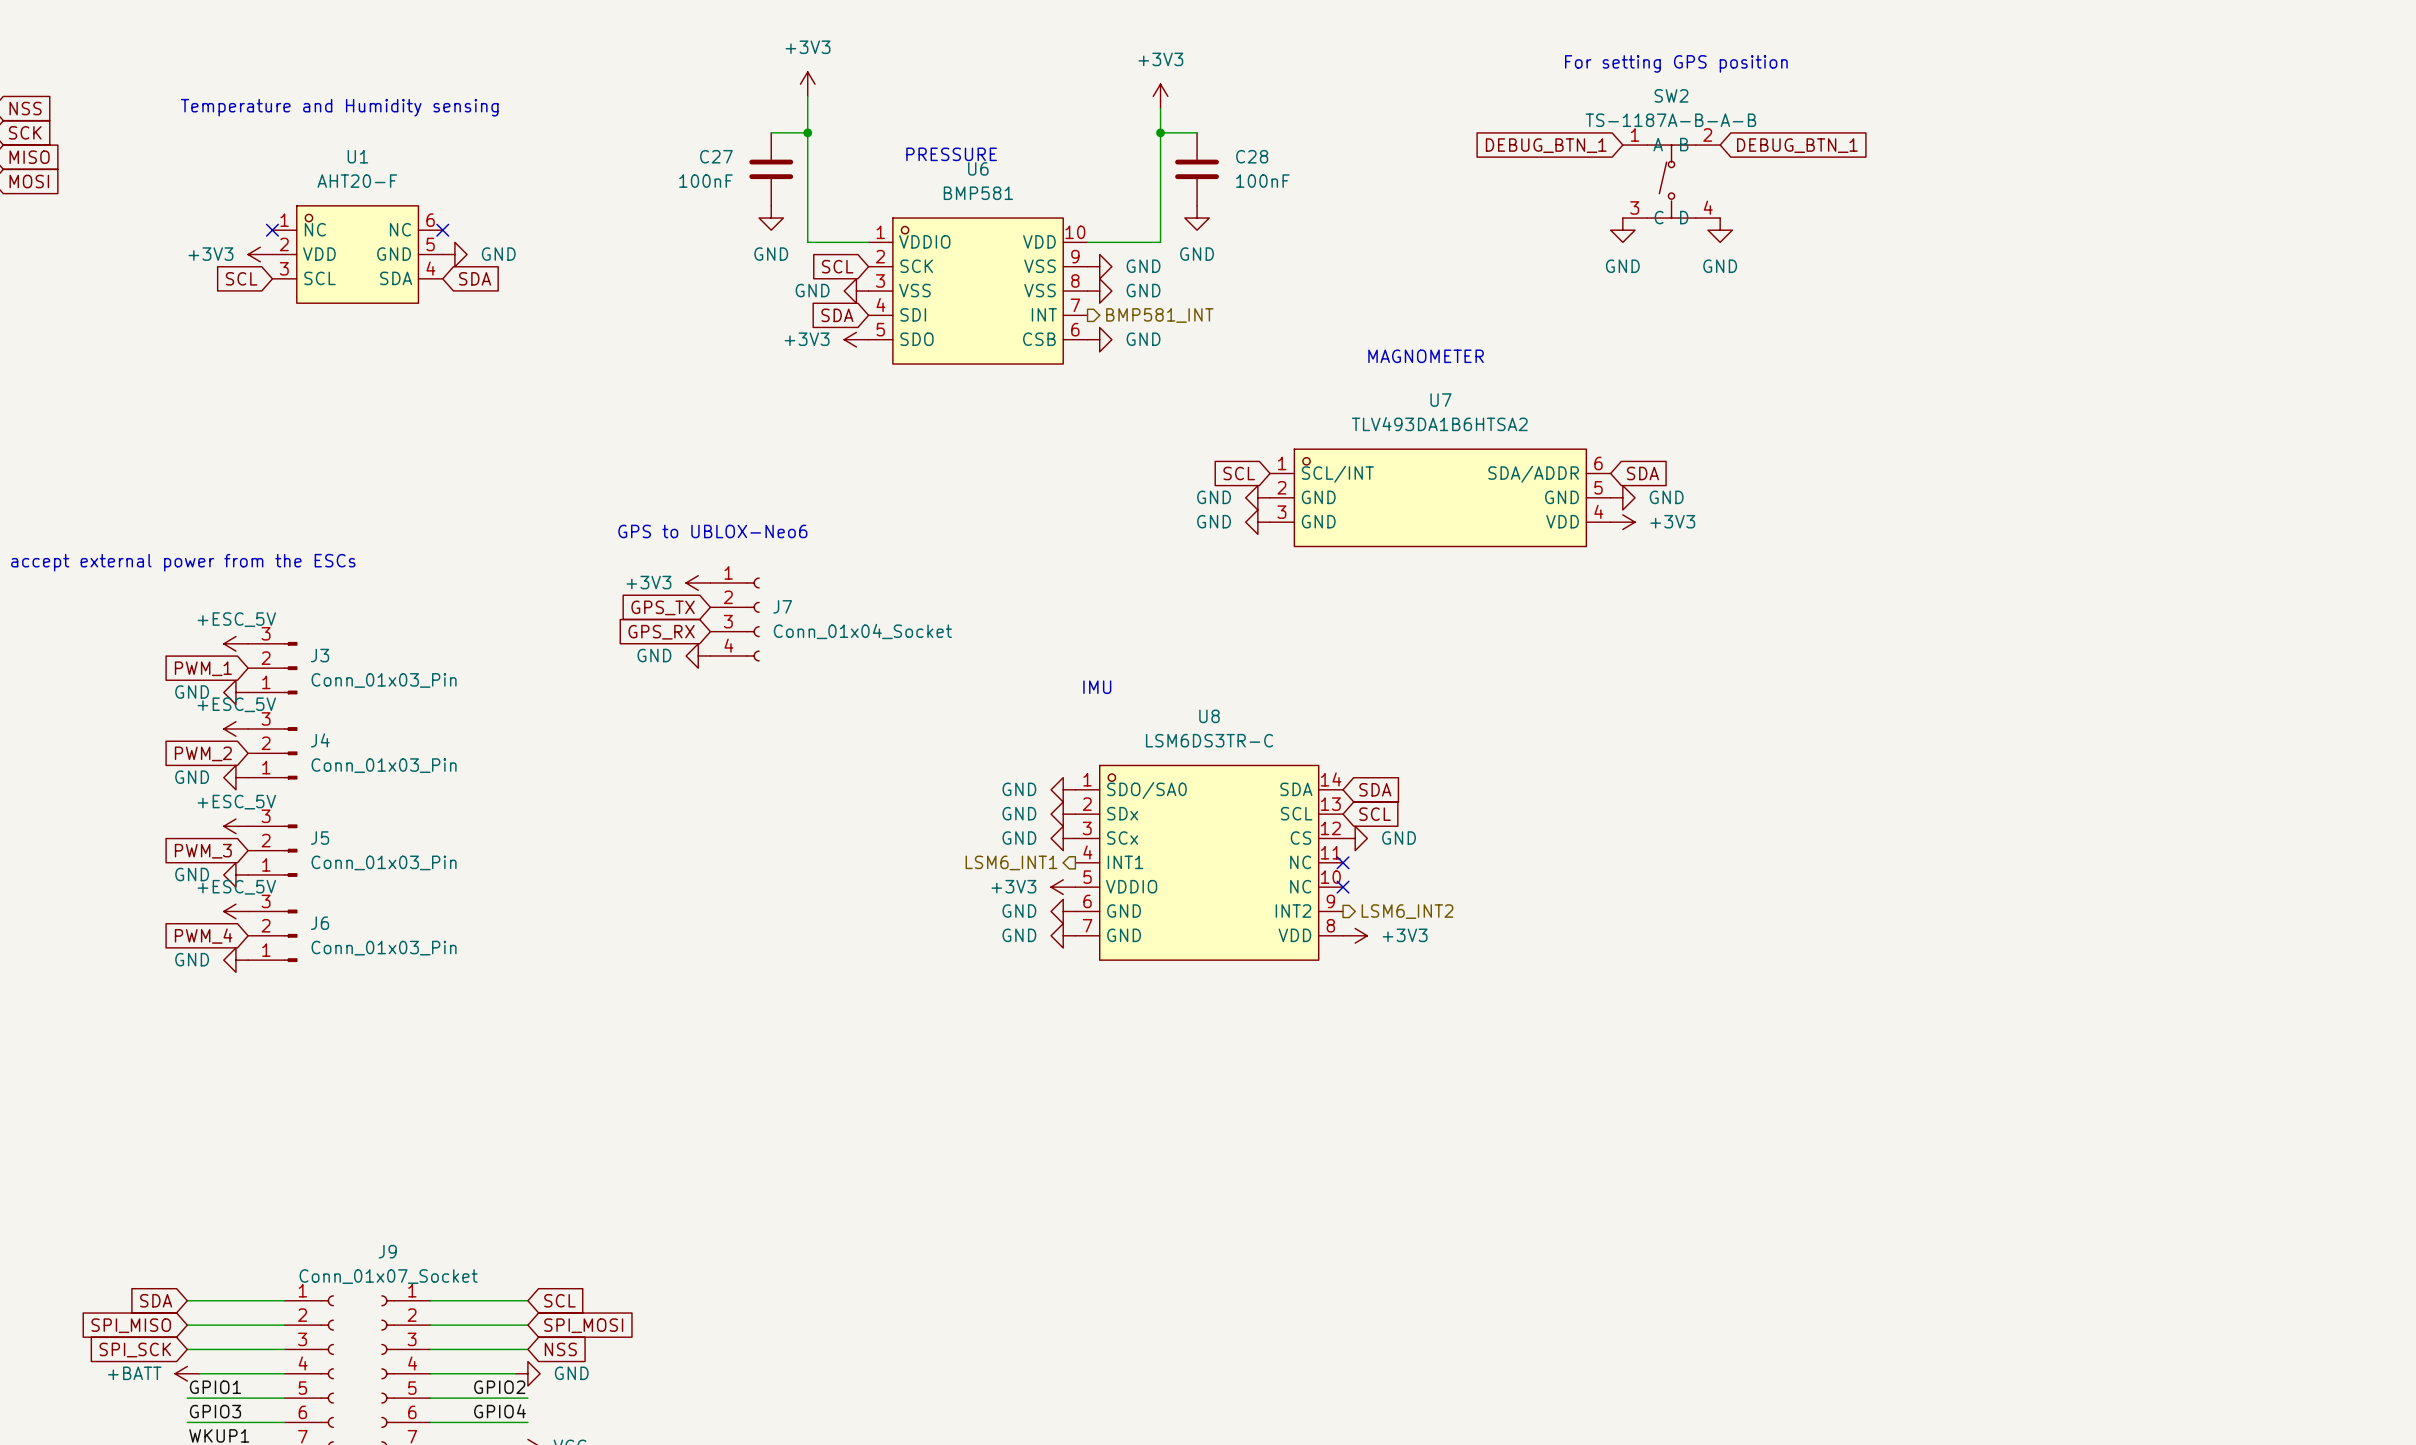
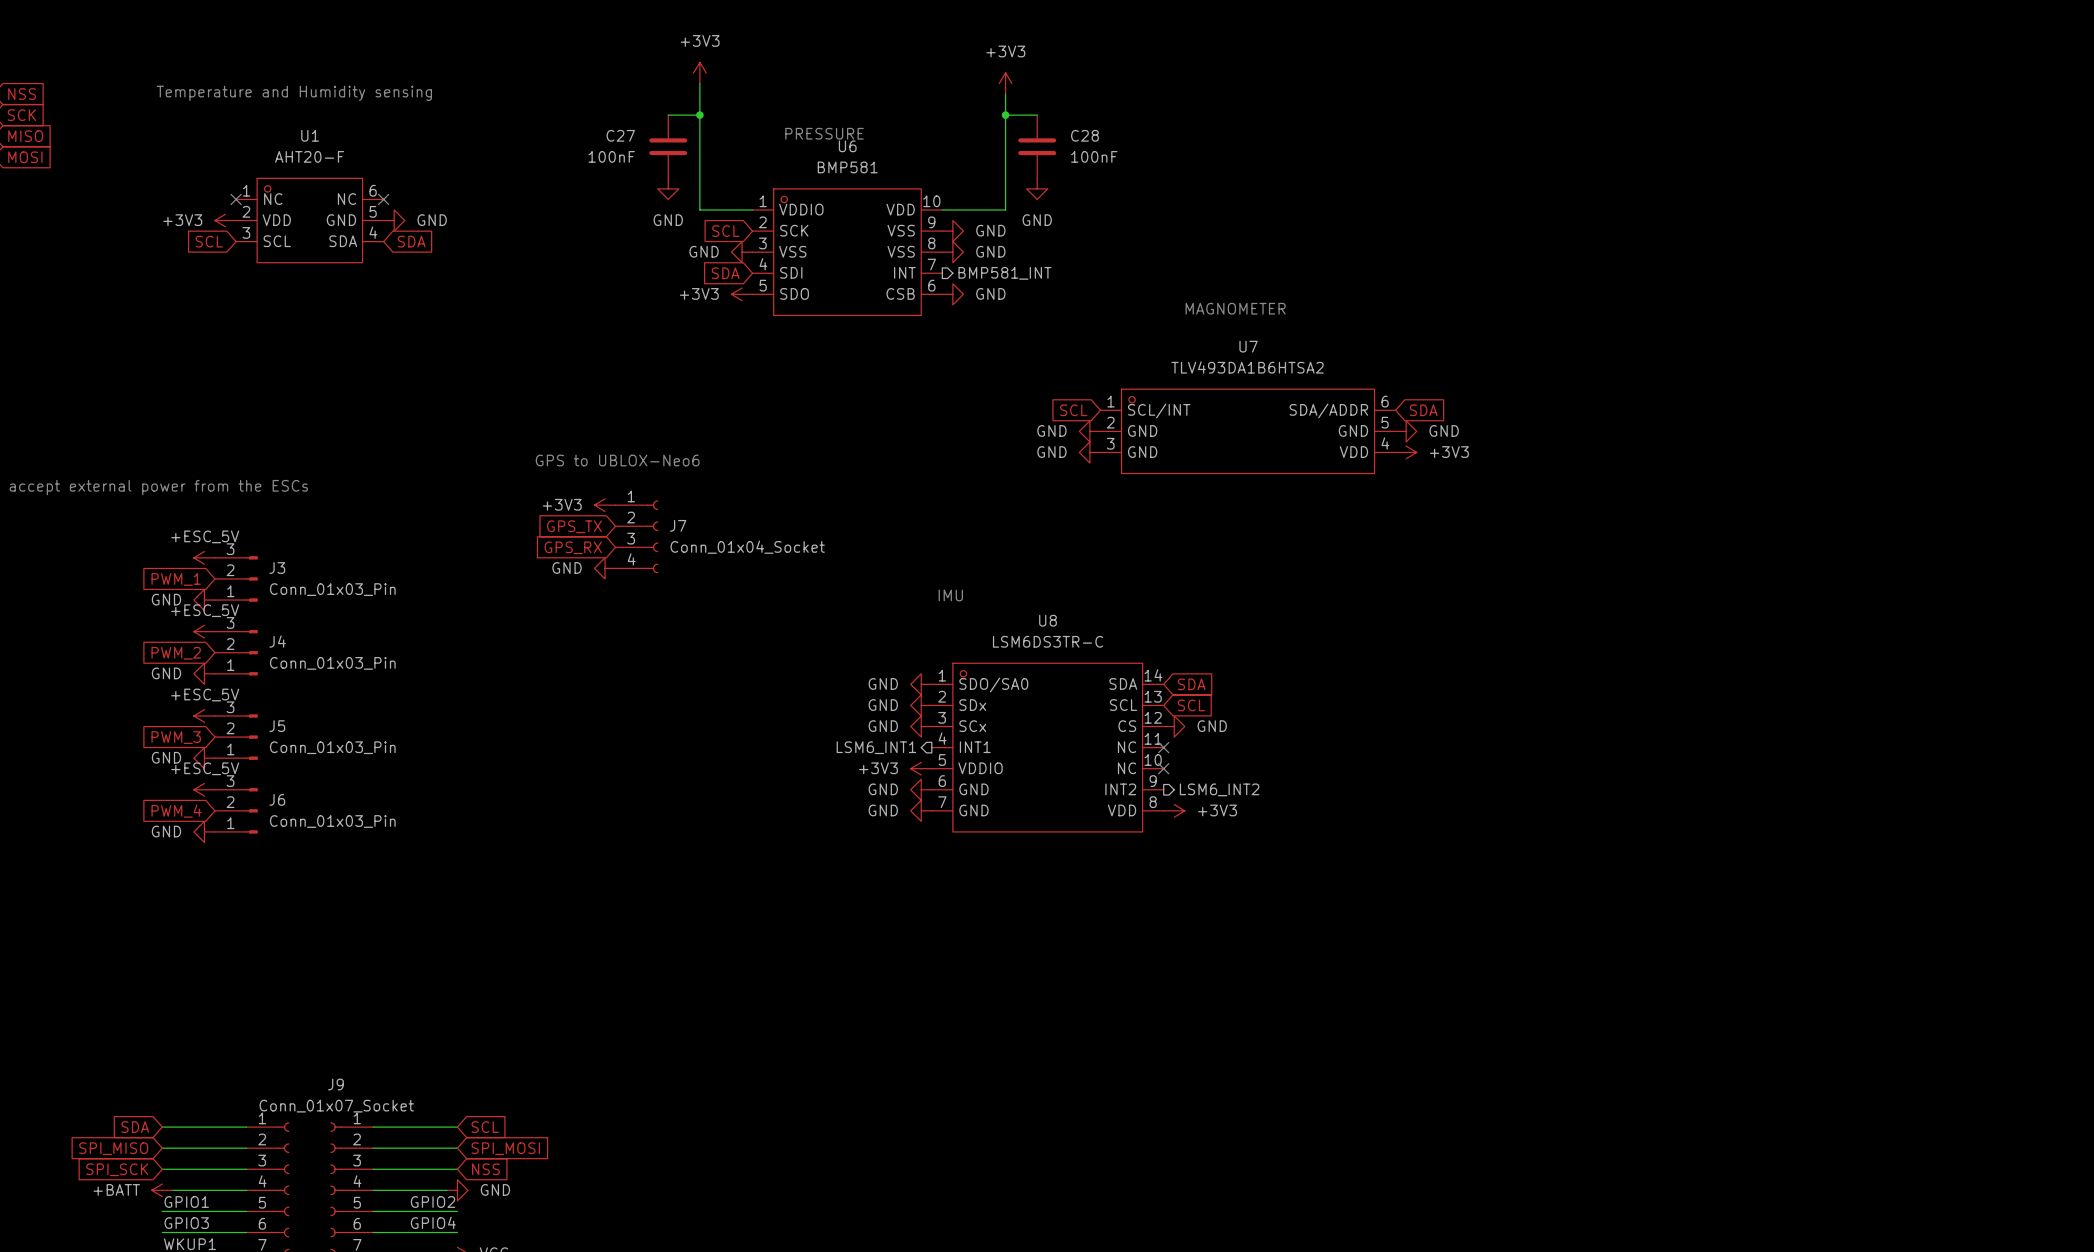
text: For setting GPS position (1676, 63) -> none
global label: DEBUG_BTN_1 (1546, 145) -> none
global label: DEBUG_BTN_1 (1797, 145) -> none
SW2: TS-1187A-B-A-B (1671, 181) -> none
power symbol: GND (1622, 230) -> none
power symbol: GND (1720, 230) -> none

